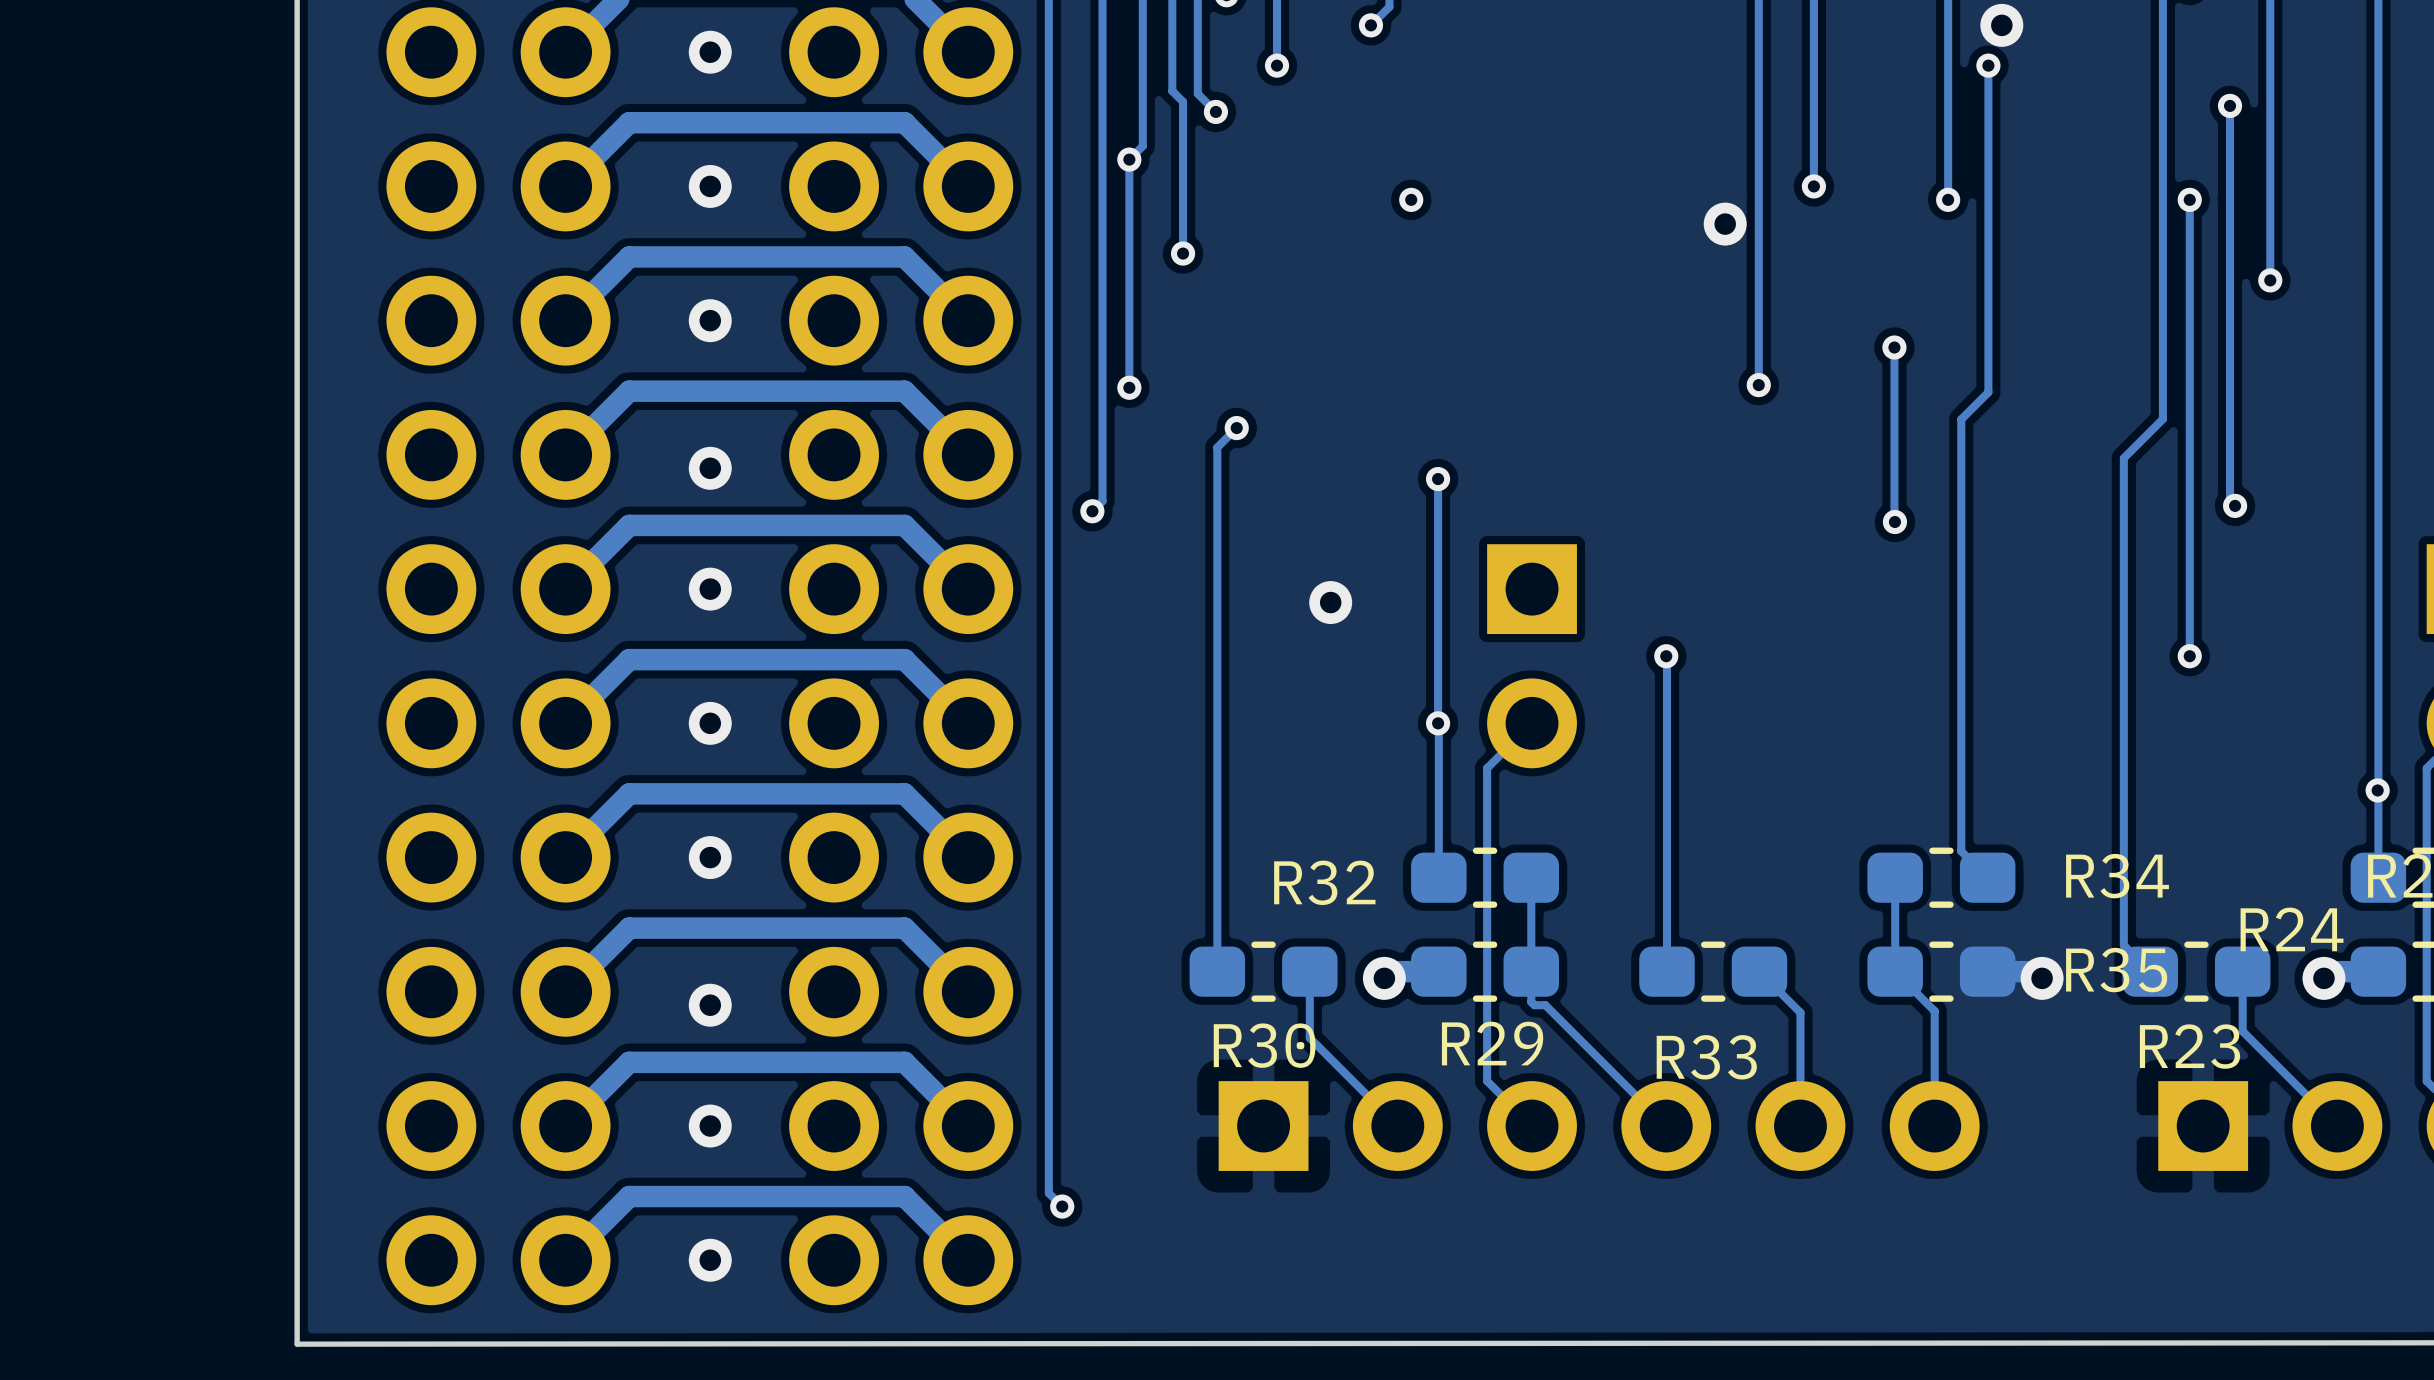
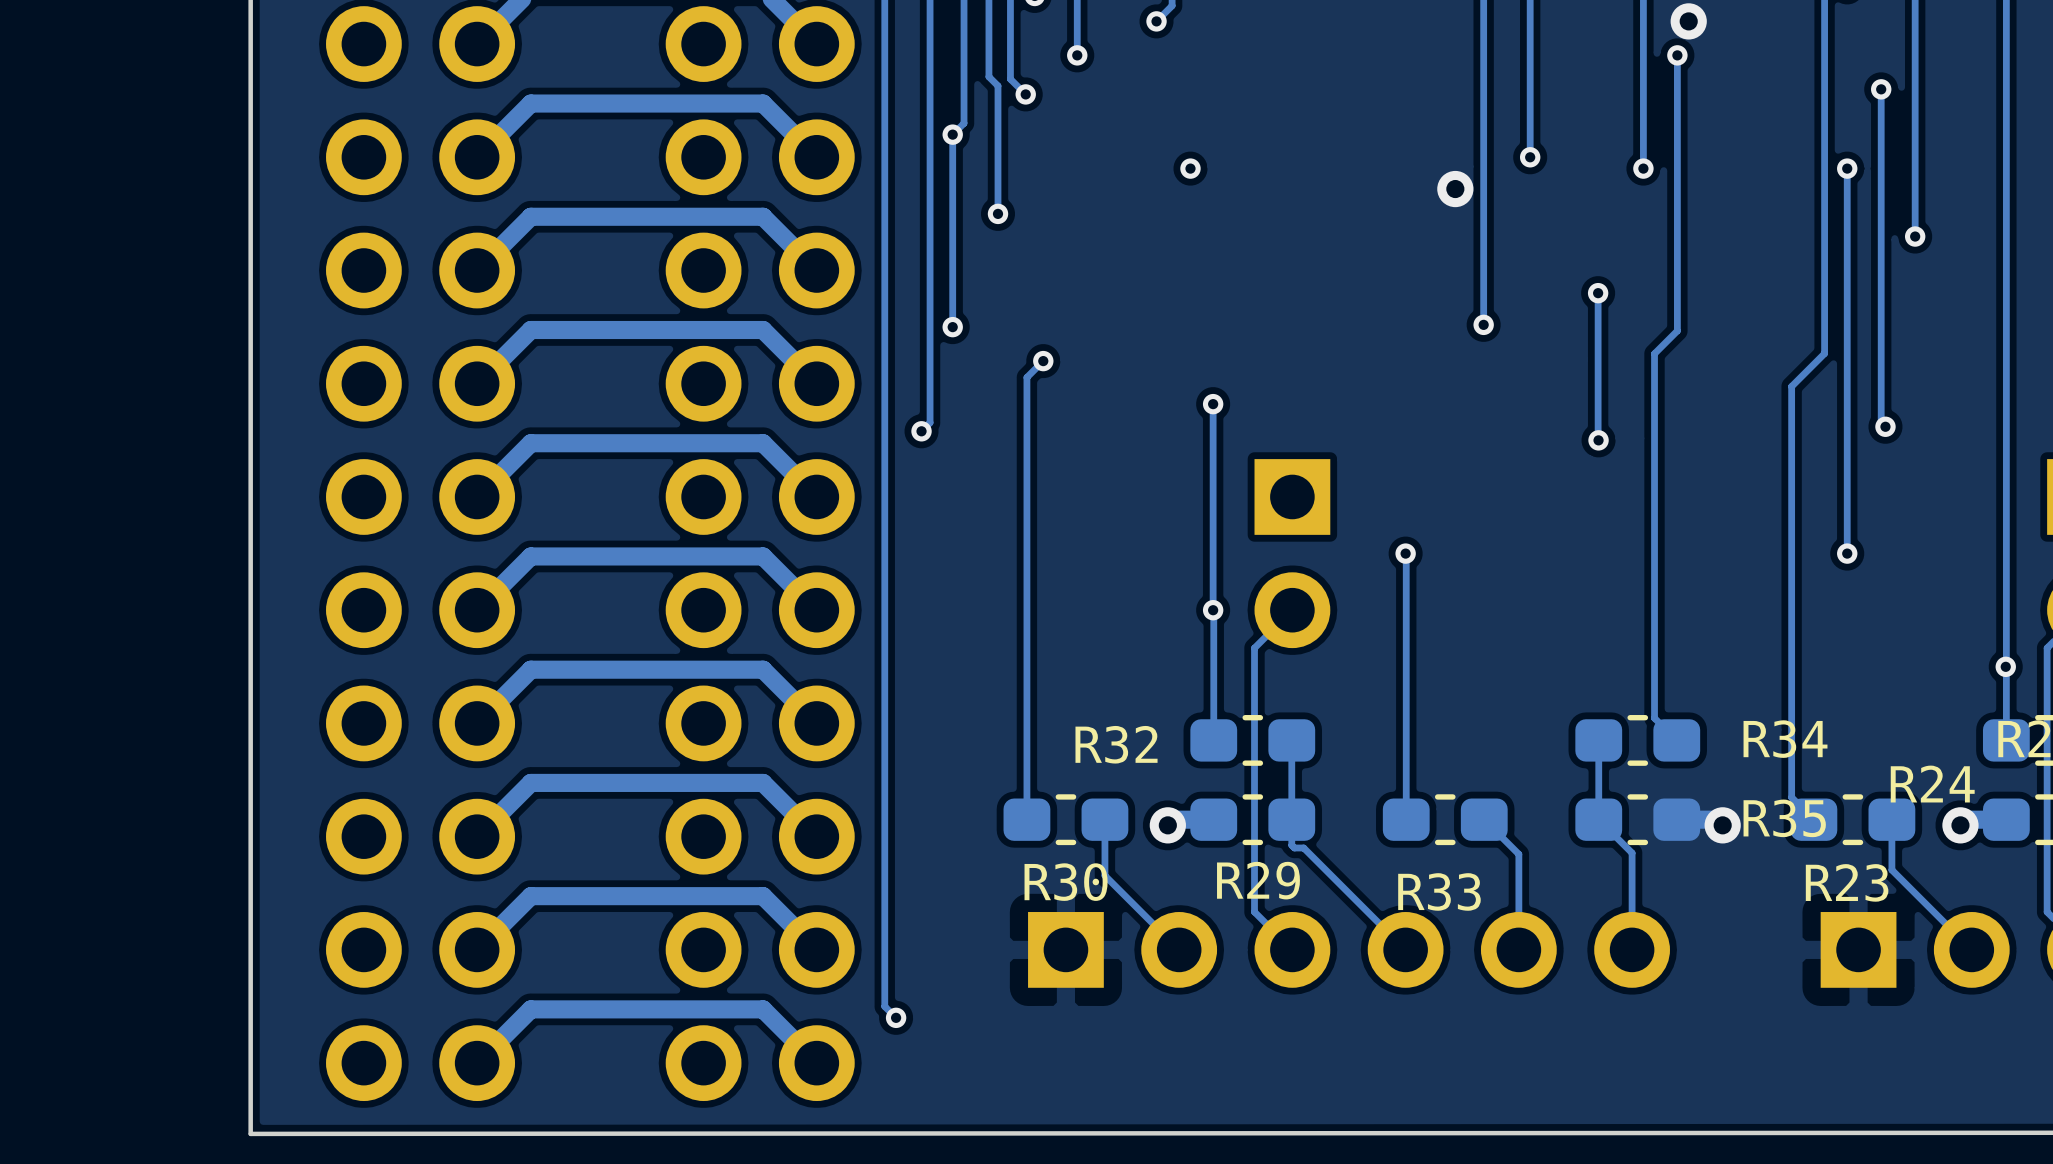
via: (710, 52) -> none
via: (710, 186) -> none
via: (710, 320) -> none
via: (710, 468) -> none
via: (710, 589) -> none
via: (1330, 602) -> none
via: (710, 723) -> none
via: (710, 857) -> none
via: (710, 1005) -> none
via: (710, 1126) -> none
via: (710, 1260) -> none

